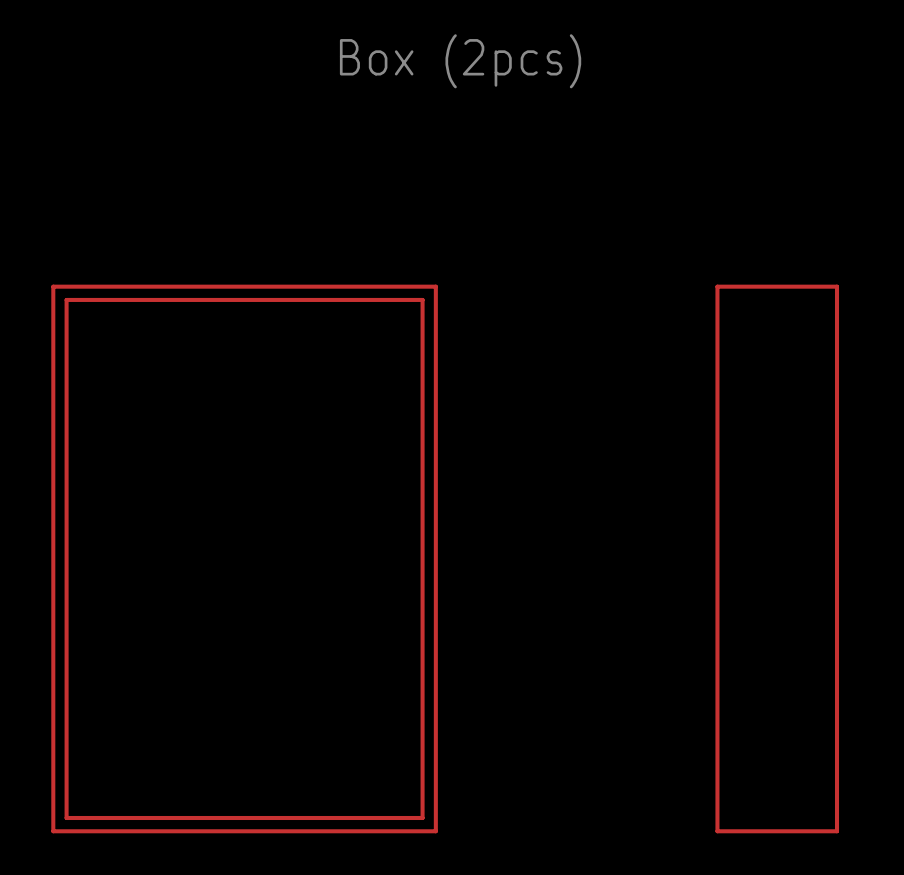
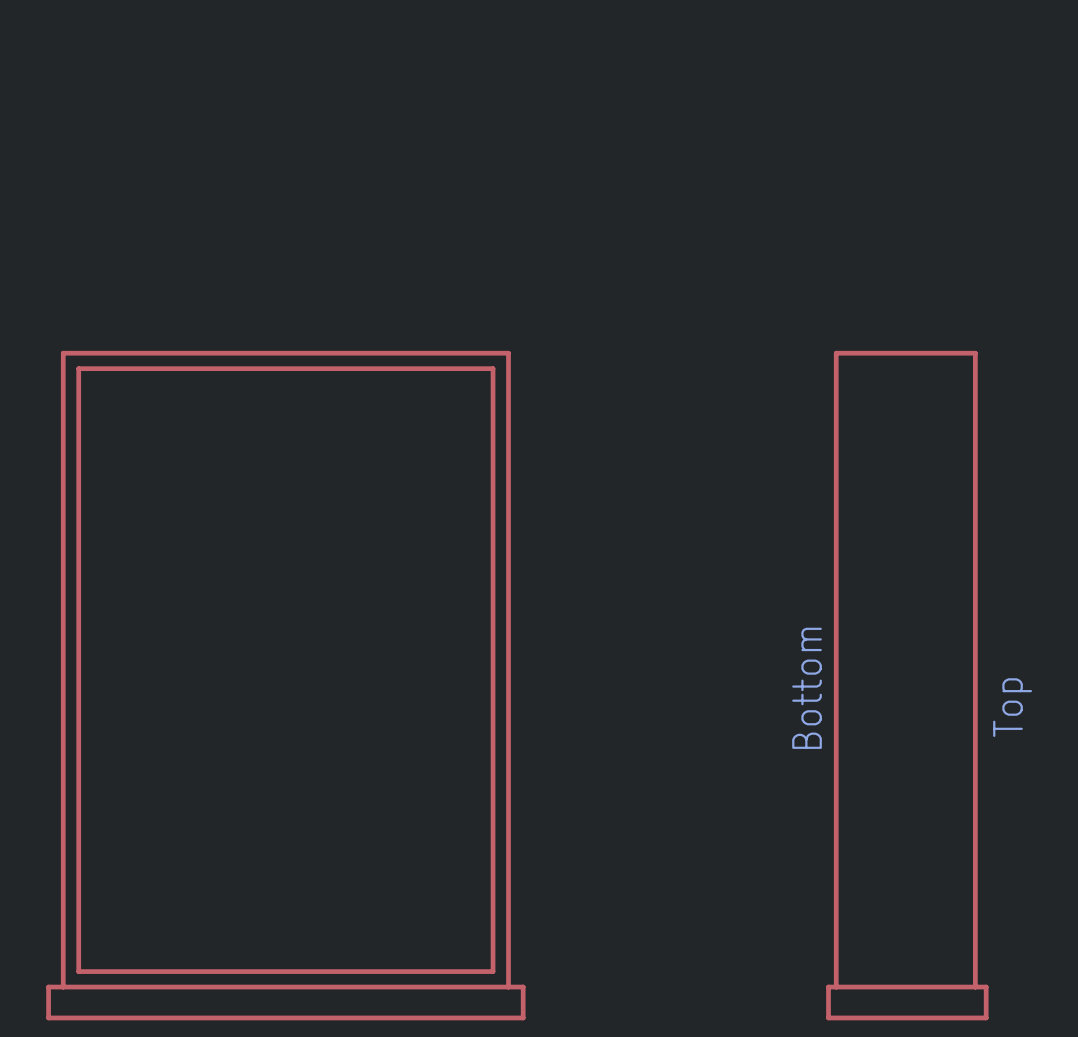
text: Box (2pcs) (460, 61) -> none
text: none -> Bottom (807, 688)
text: none -> Top (1012, 707)
line: none -> (63, 987) (48, 987) (48, 1017) (523, 1017) (523, 987) (508, 987)
line: none -> (836, 987) (828, 987) (828, 1017) (986, 1017) (986, 987) (975, 987)

